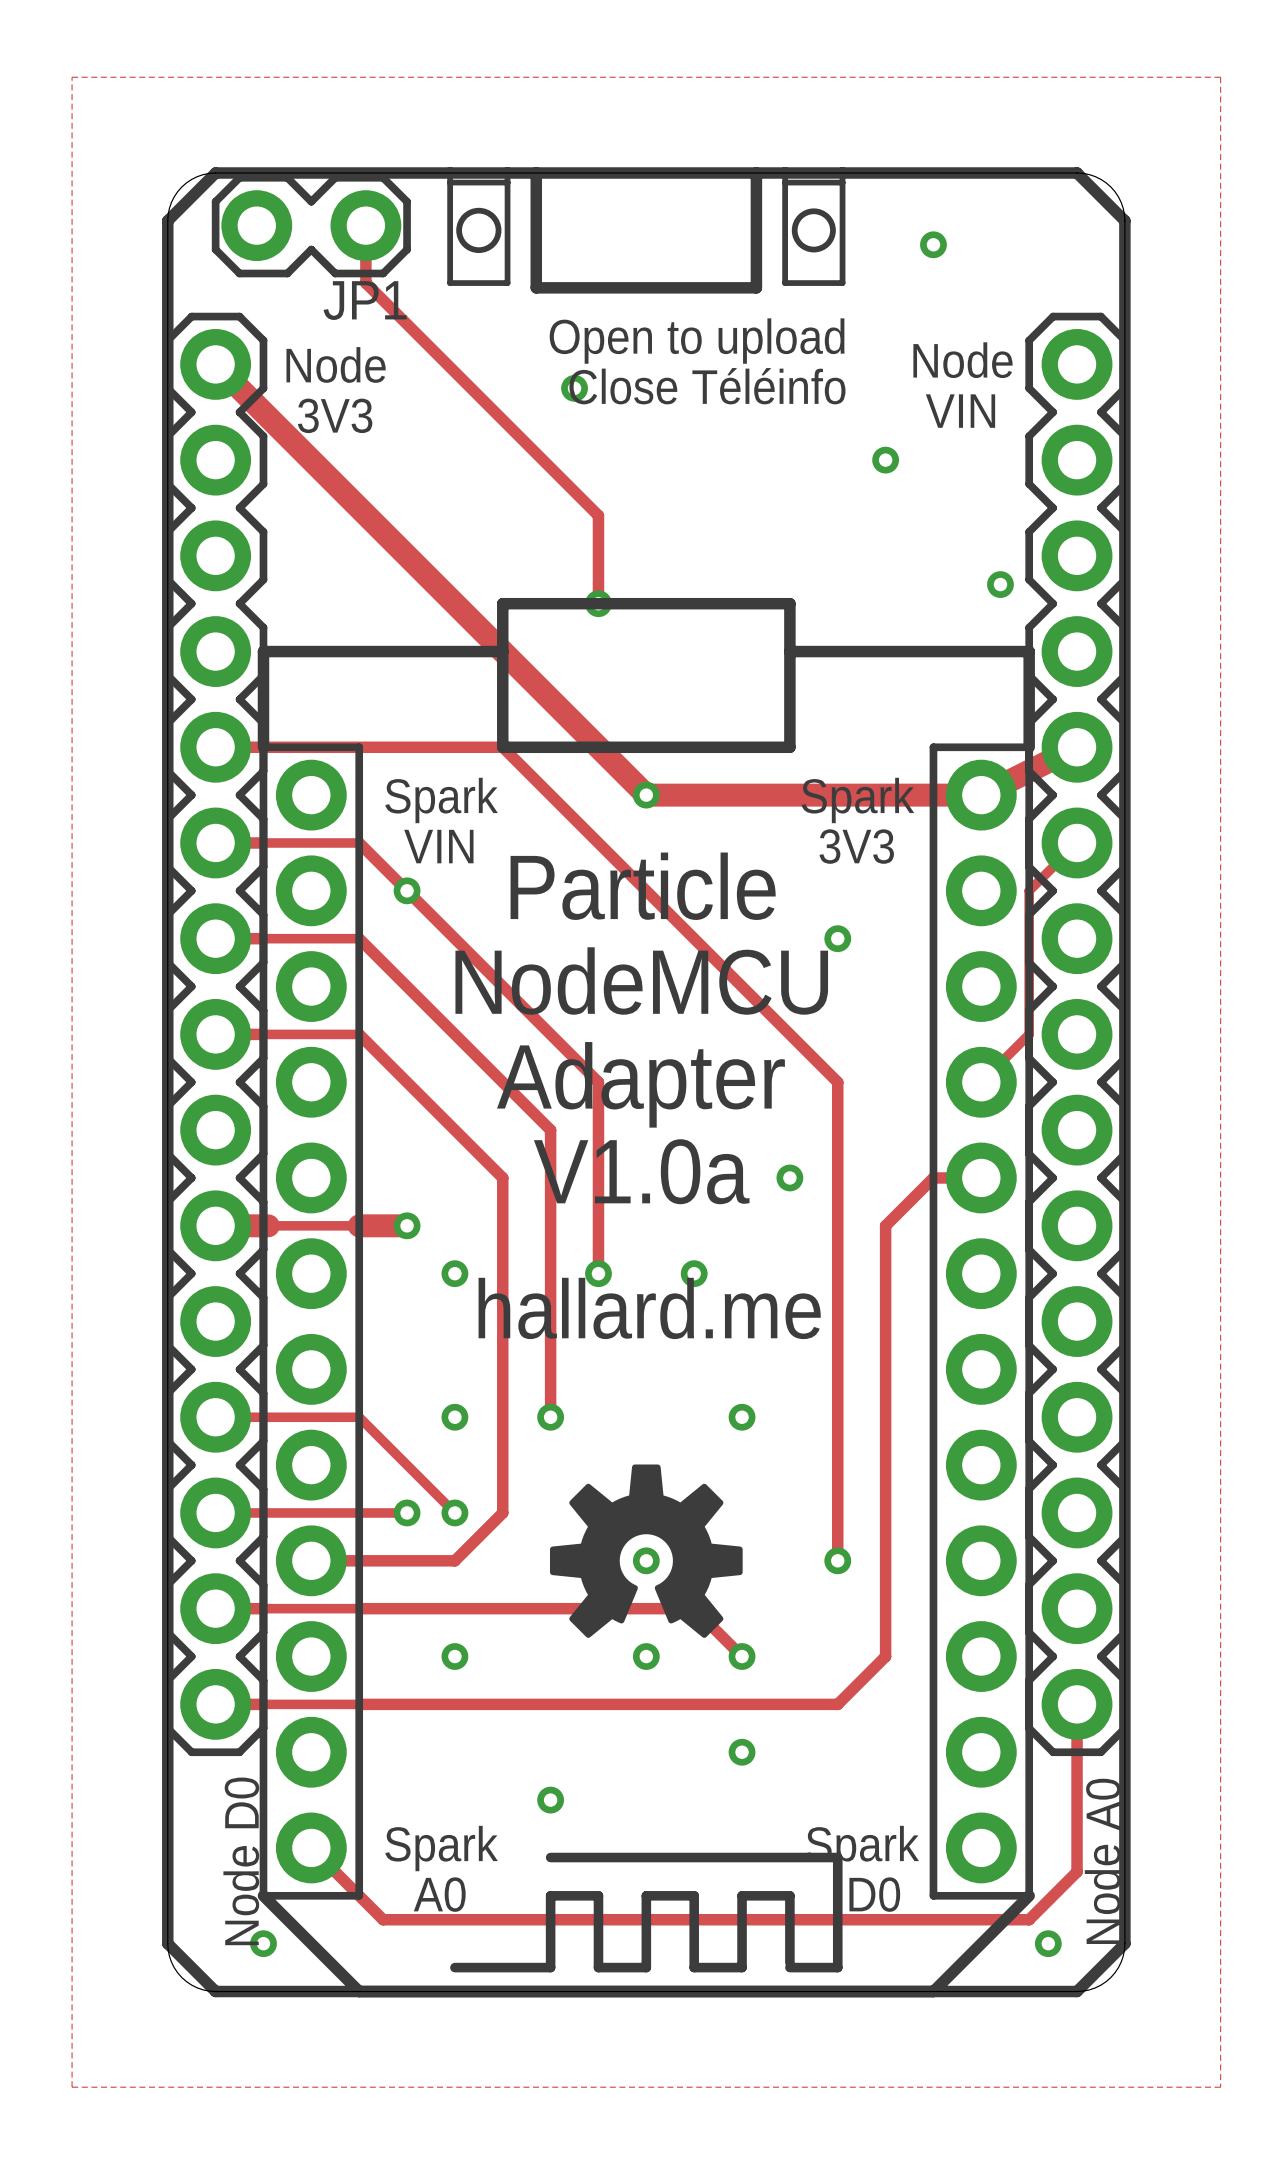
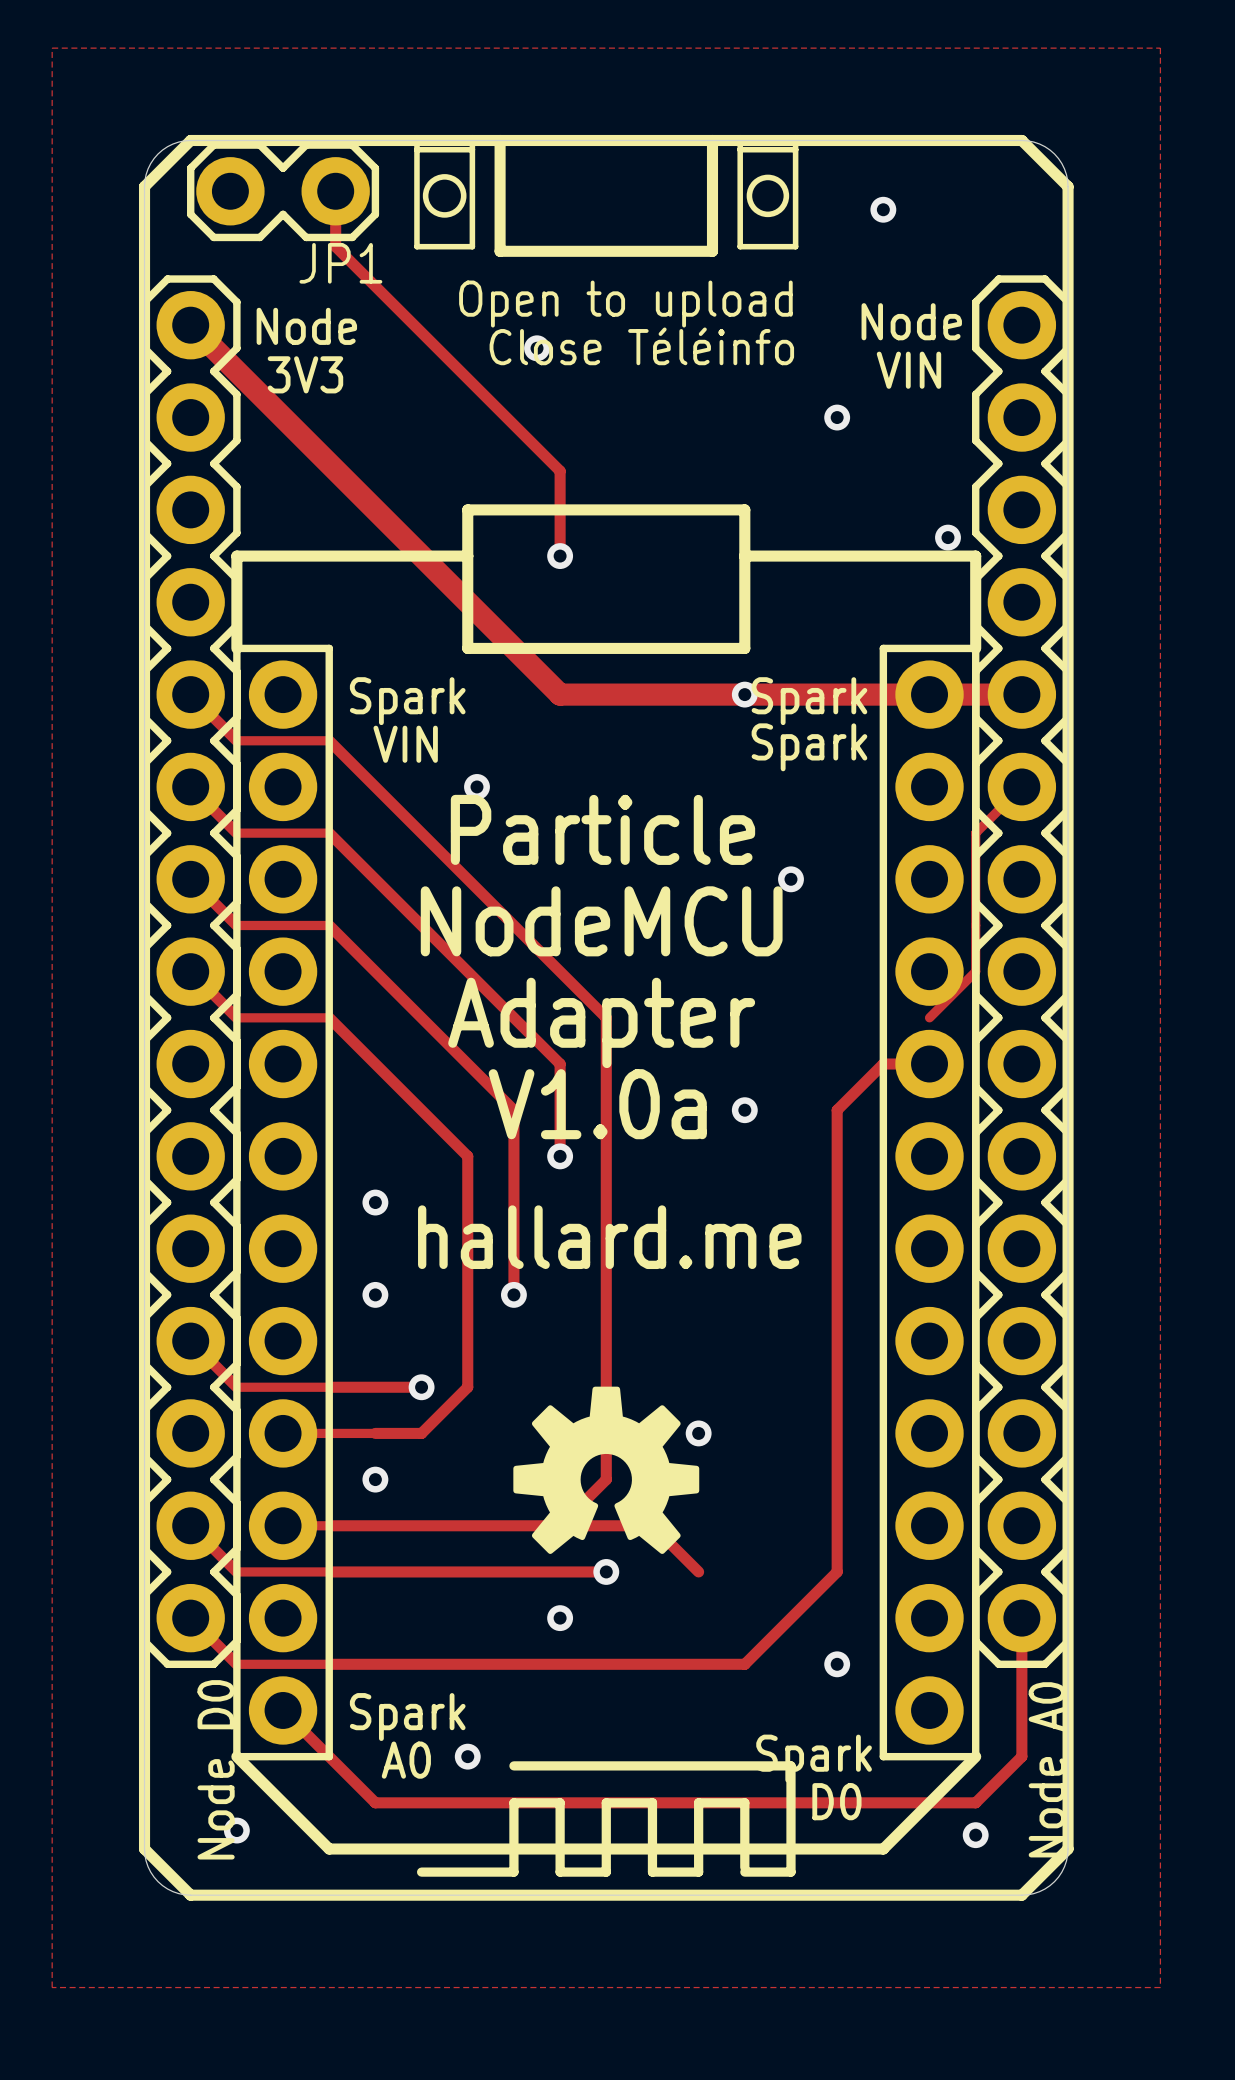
track: (215, 747) (502, 747) (837, 1082) (837, 1560) -> (190, 694) (236, 740) (329, 740) (606, 1017) (606, 1479) (560, 1525)
track: (598, 747) (646, 795) (981, 795) (1077, 747) -> (560, 694) (1021, 694)
via: none -> (744, 694)
text: none -> Spark (407, 701)
text: none -> Spark (809, 701)
via: (646, 795) -> none
text: Spark (441, 800) -> VIN (405, 744)
track: (215, 842) (359, 842) (598, 1082) (598, 1130) -> (190, 786) (236, 833) (329, 833) (560, 1064)
via: none -> (476, 786)
text: VIN (438, 846) -> none
text: 3V3 (856, 846) -> none
via: (407, 890) -> none
track: (215, 938) (359, 938) (550, 1130) (550, 1177) -> (190, 879) (236, 925) (329, 925) (513, 1110)
track: (215, 1034) (359, 1034) (502, 1177) (502, 1225) -> (190, 971) (236, 1017) (329, 1017) (467, 1156)
track: (981, 1177) (933, 1177) (885, 1225) -> (929, 1064) (883, 1064) (837, 1110) (837, 1156)
track: (215, 1225) (407, 1225) -> none
via: (407, 1225) -> none
track: (598, 1225) (598, 1273) -> none
via: none -> (375, 1202)
via: (454, 1273) -> none
via position: (598, 1273) -> (560, 1156)
via: (694, 1273) -> none
part position: (646, 1297) -> (606, 1179)
via: none -> (375, 1294)
track: (550, 1369) (550, 1417) -> none
track: (215, 1417) (359, 1417) (454, 1512) -> (190, 1341) (236, 1387) (421, 1387)
via: (454, 1417) -> none
via position: (550, 1417) -> (513, 1294)
via: (742, 1417) -> none
via: none -> (421, 1387)
track: (502, 1465) (502, 1512) (454, 1560) (311, 1560) -> (467, 1387) (421, 1433) (375, 1433)
track: (215, 1512) (311, 1512) -> none
via: (407, 1512) -> none
via: (454, 1512) -> none
via: none -> (698, 1433)
via: none -> (375, 1479)
via: (646, 1560) -> none
via: (837, 1560) -> none
track: (215, 1608) (311, 1608) -> (190, 1525) (236, 1571) (606, 1571)
via: (454, 1656) -> none
via: (742, 1656) -> none
track: (215, 1704) (837, 1704) -> (190, 1618) (236, 1664) (744, 1664) (790, 1618)
via: none -> (560, 1618)
via: (742, 1752) -> none
via: none -> (837, 1664)
via: (550, 1800) -> none
track: (311, 1847) (383, 1919) (1029, 1919) (1077, 1871) (1077, 1847) -> (283, 1710) (375, 1802) (975, 1802) (1021, 1756)
via: none -> (467, 1756)
text position: Spark (441, 1848) -> Spark (407, 1717)
text position: A0 (439, 1894) -> A0 (406, 1760)
via position: (263, 1943) -> (236, 1830)
via position: (1048, 1943) -> (975, 1835)

